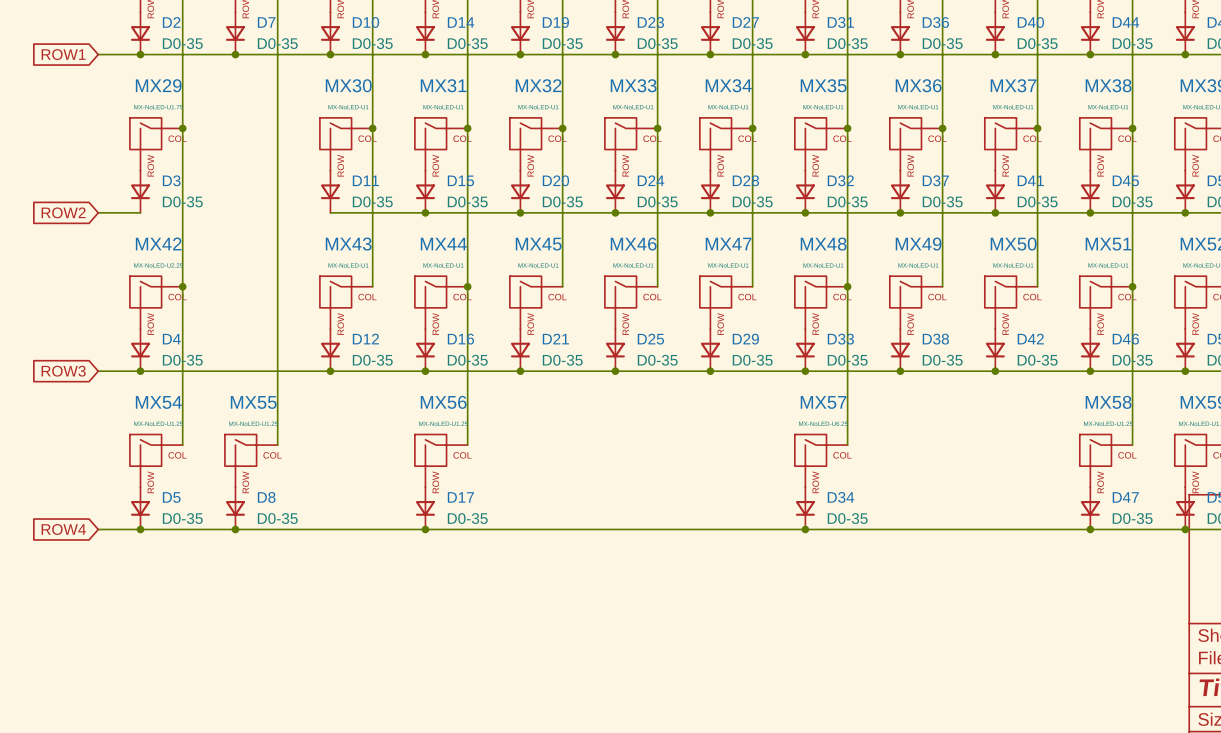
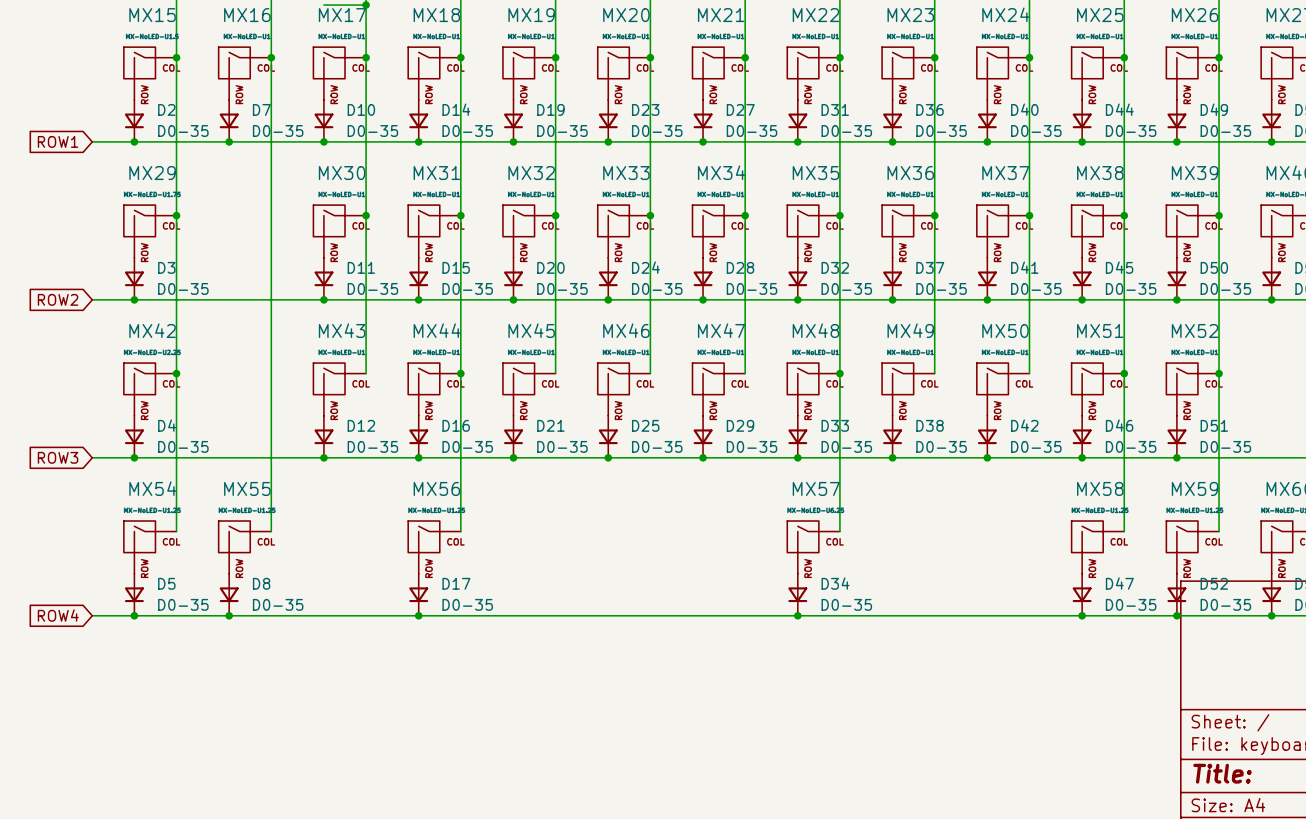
wire: none -> (134, 299) (323, 299)
junction: none -> (134, 299)
junction: none -> (323, 299)

